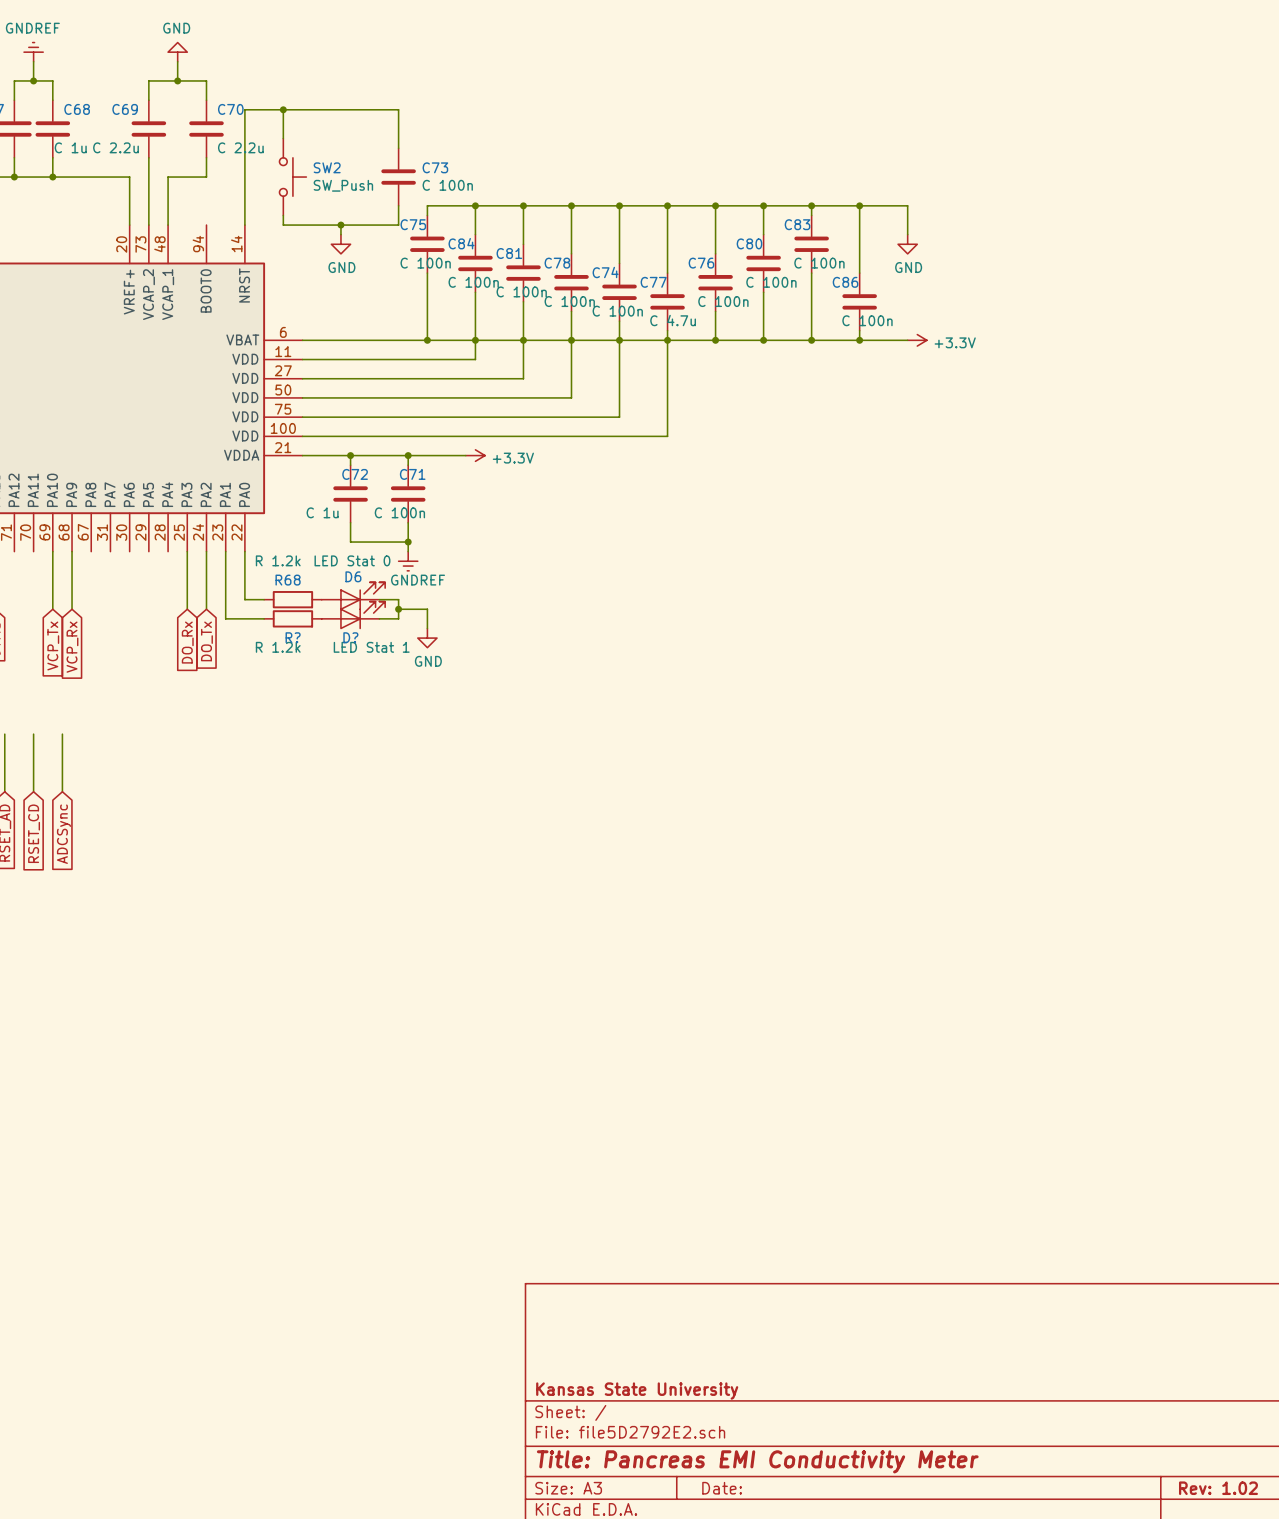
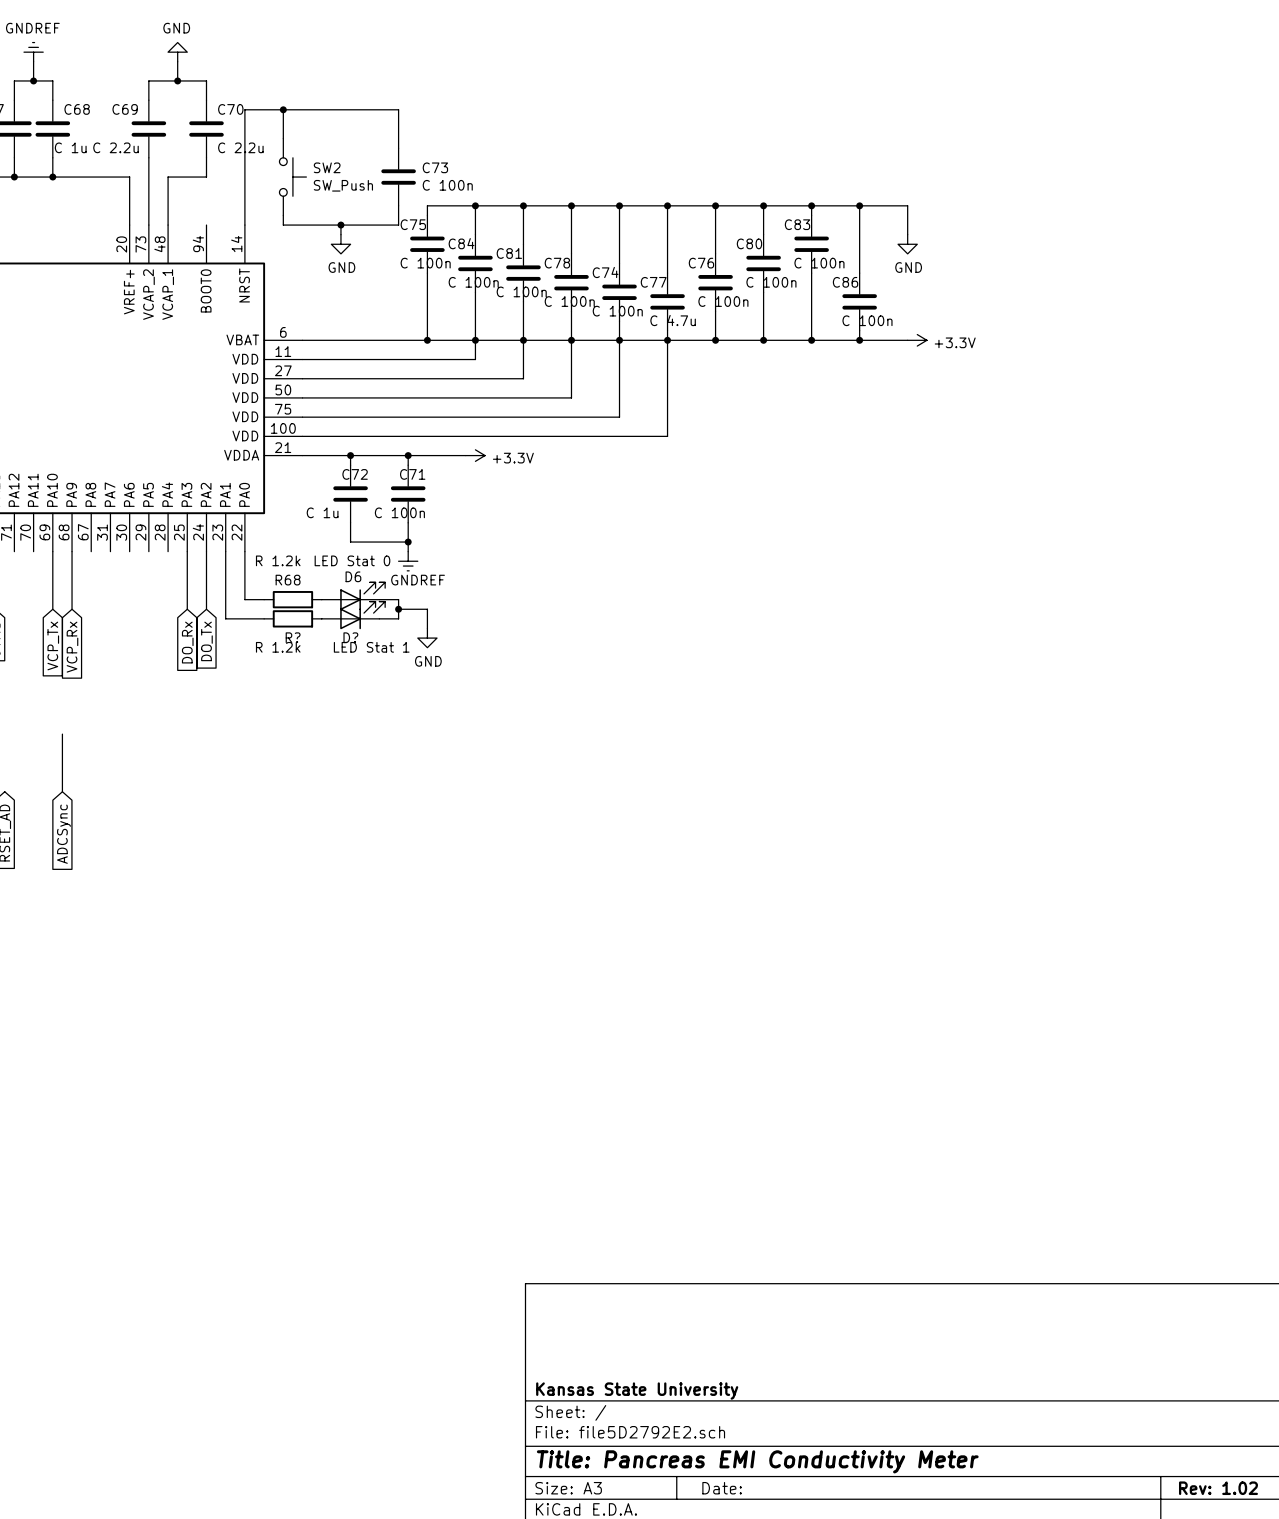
wire: (4, 734) (4, 791) -> none
wire: (33, 734) (33, 791) -> none
global label: RSET_CD (34, 833) -> none

